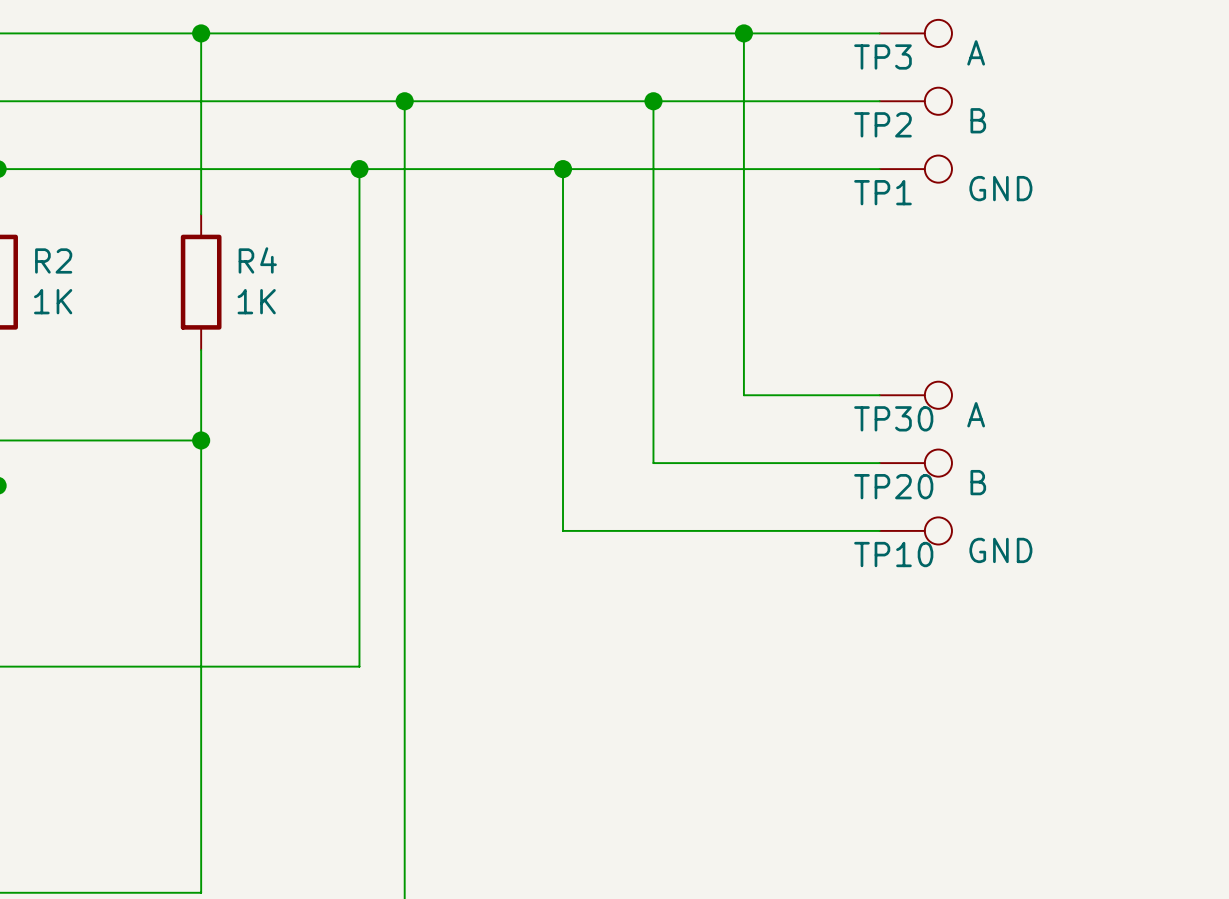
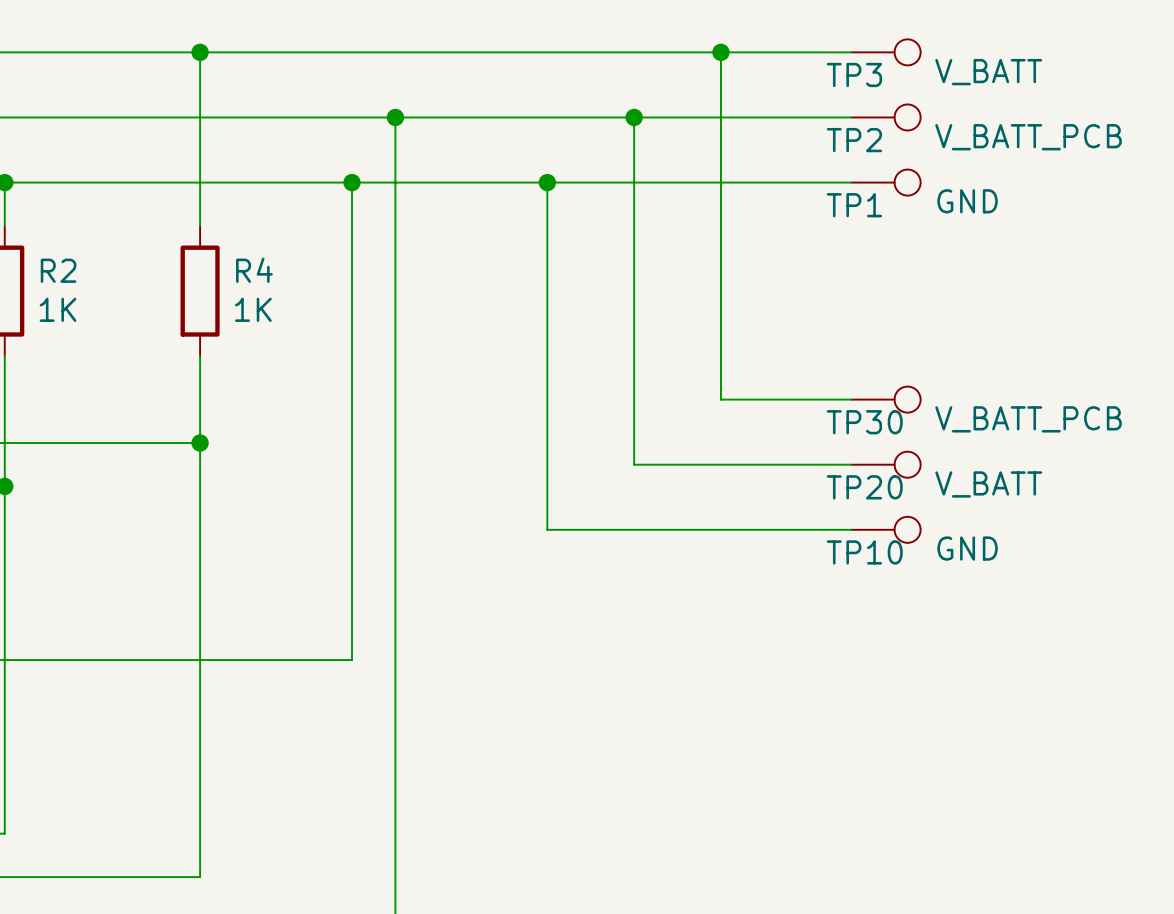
TP3 value: A (976, 52) -> V_BATT (988, 72)
TP2 value: B (978, 120) -> V_BATT_PCB (1028, 137)
TP30 value: A (976, 414) -> V_BATT_PCB (1028, 419)
TP20 value: B (978, 482) -> V_BATT (988, 484)

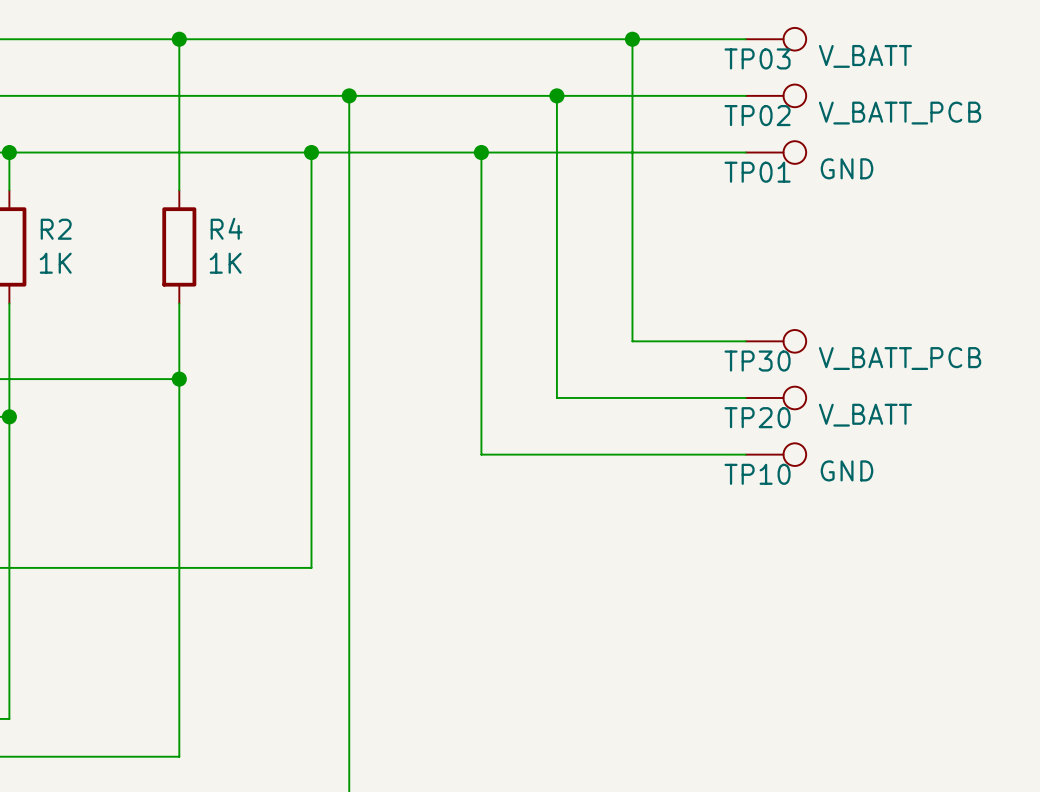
TP3 name: TP3 (854, 74) -> TP03 (757, 58)
TP2 name: TP2 (854, 140) -> TP02 (757, 115)
TP1 name: TP1 (854, 205) -> TP01 (757, 172)

